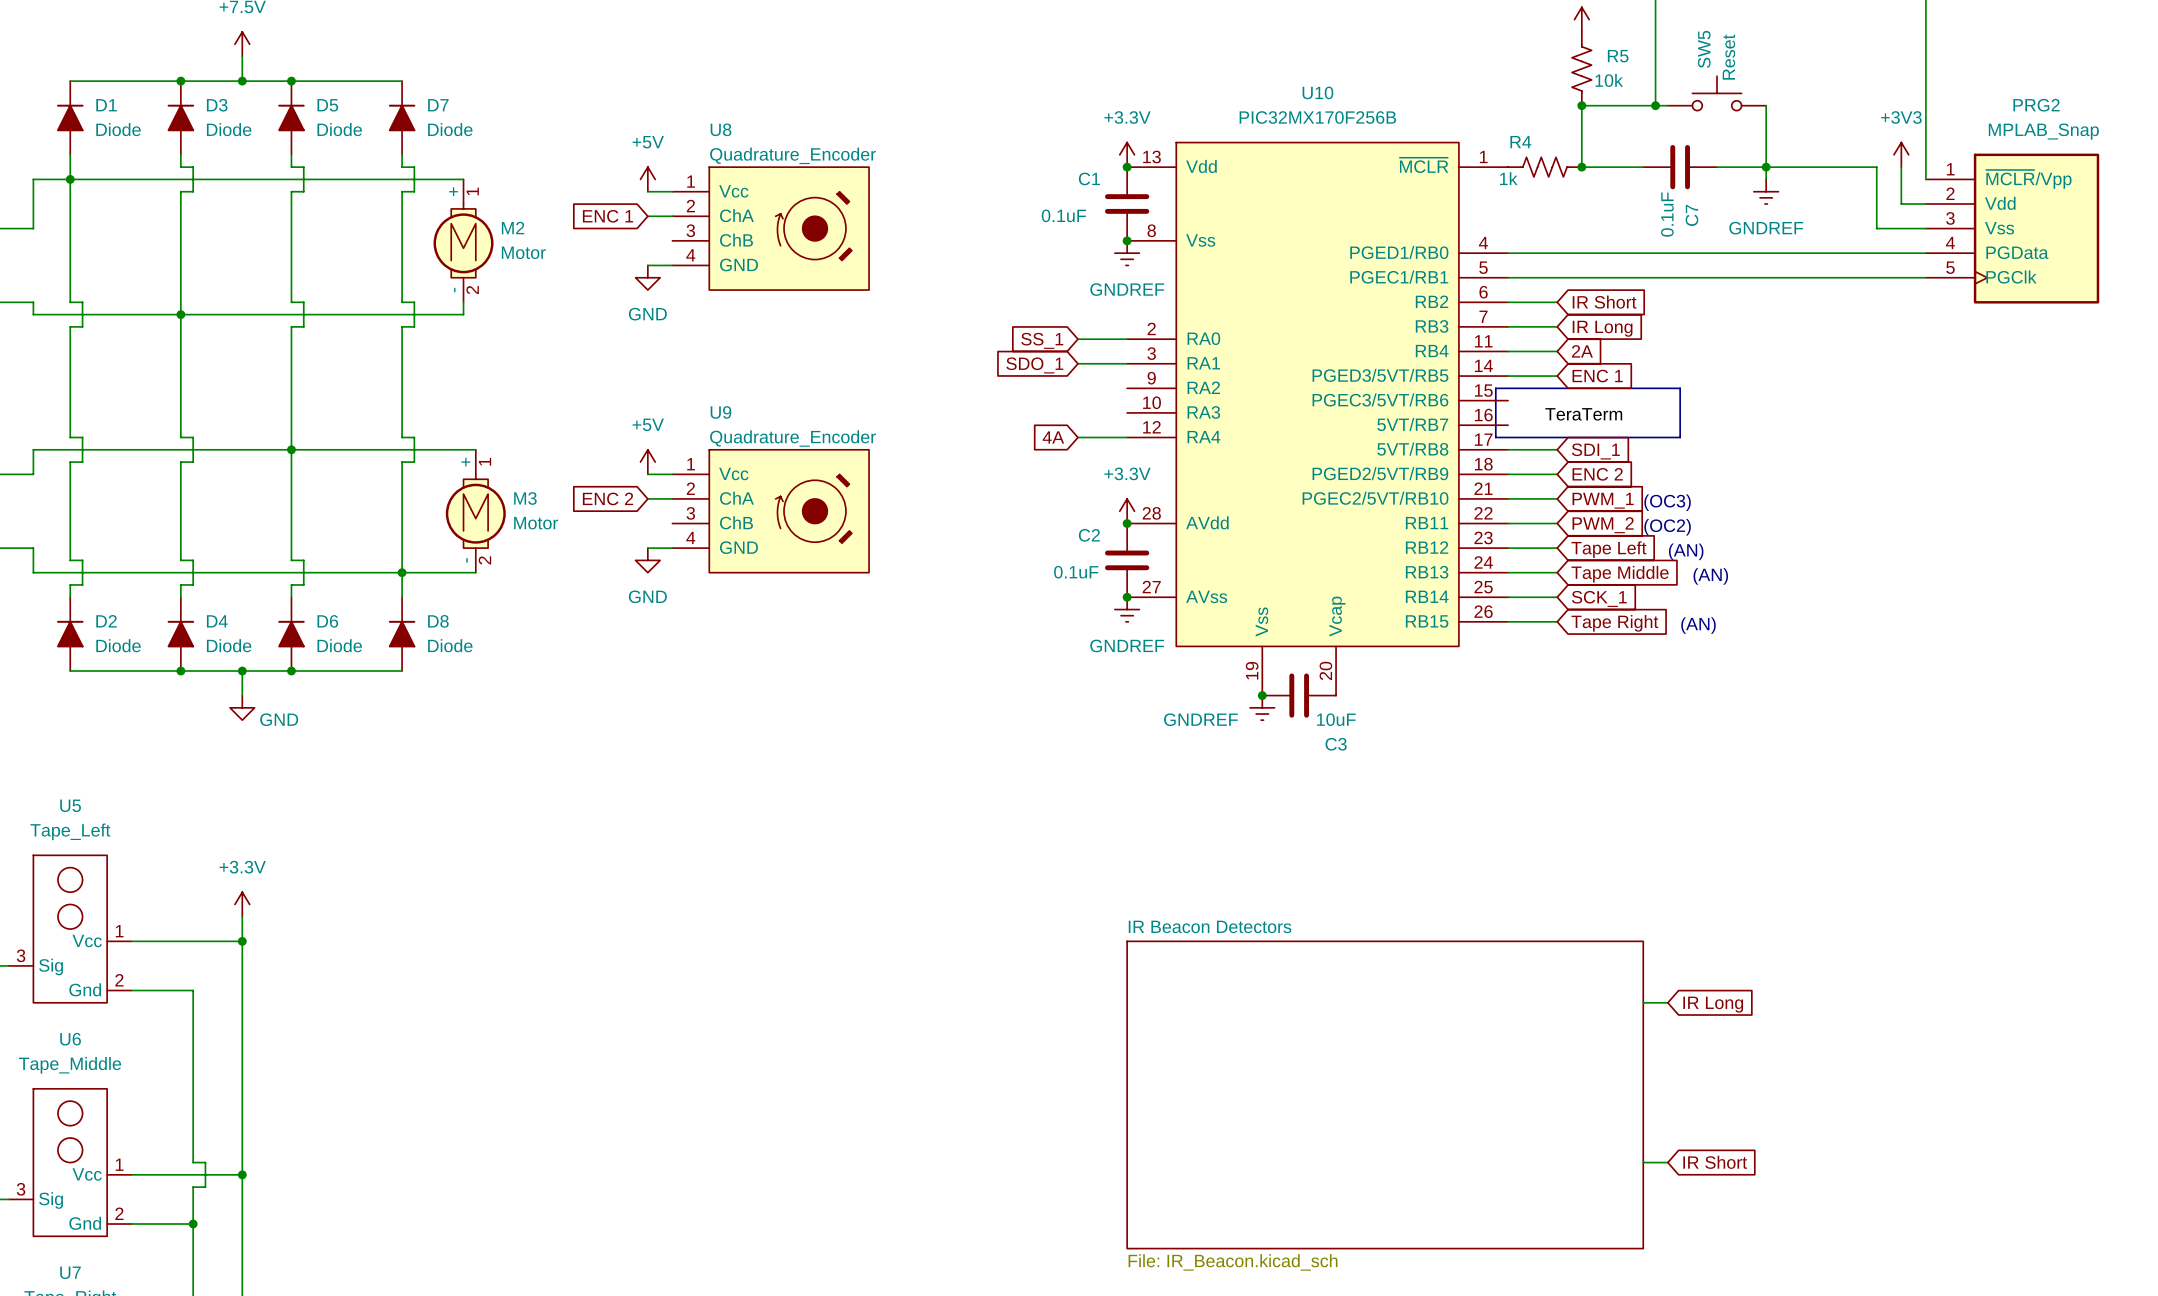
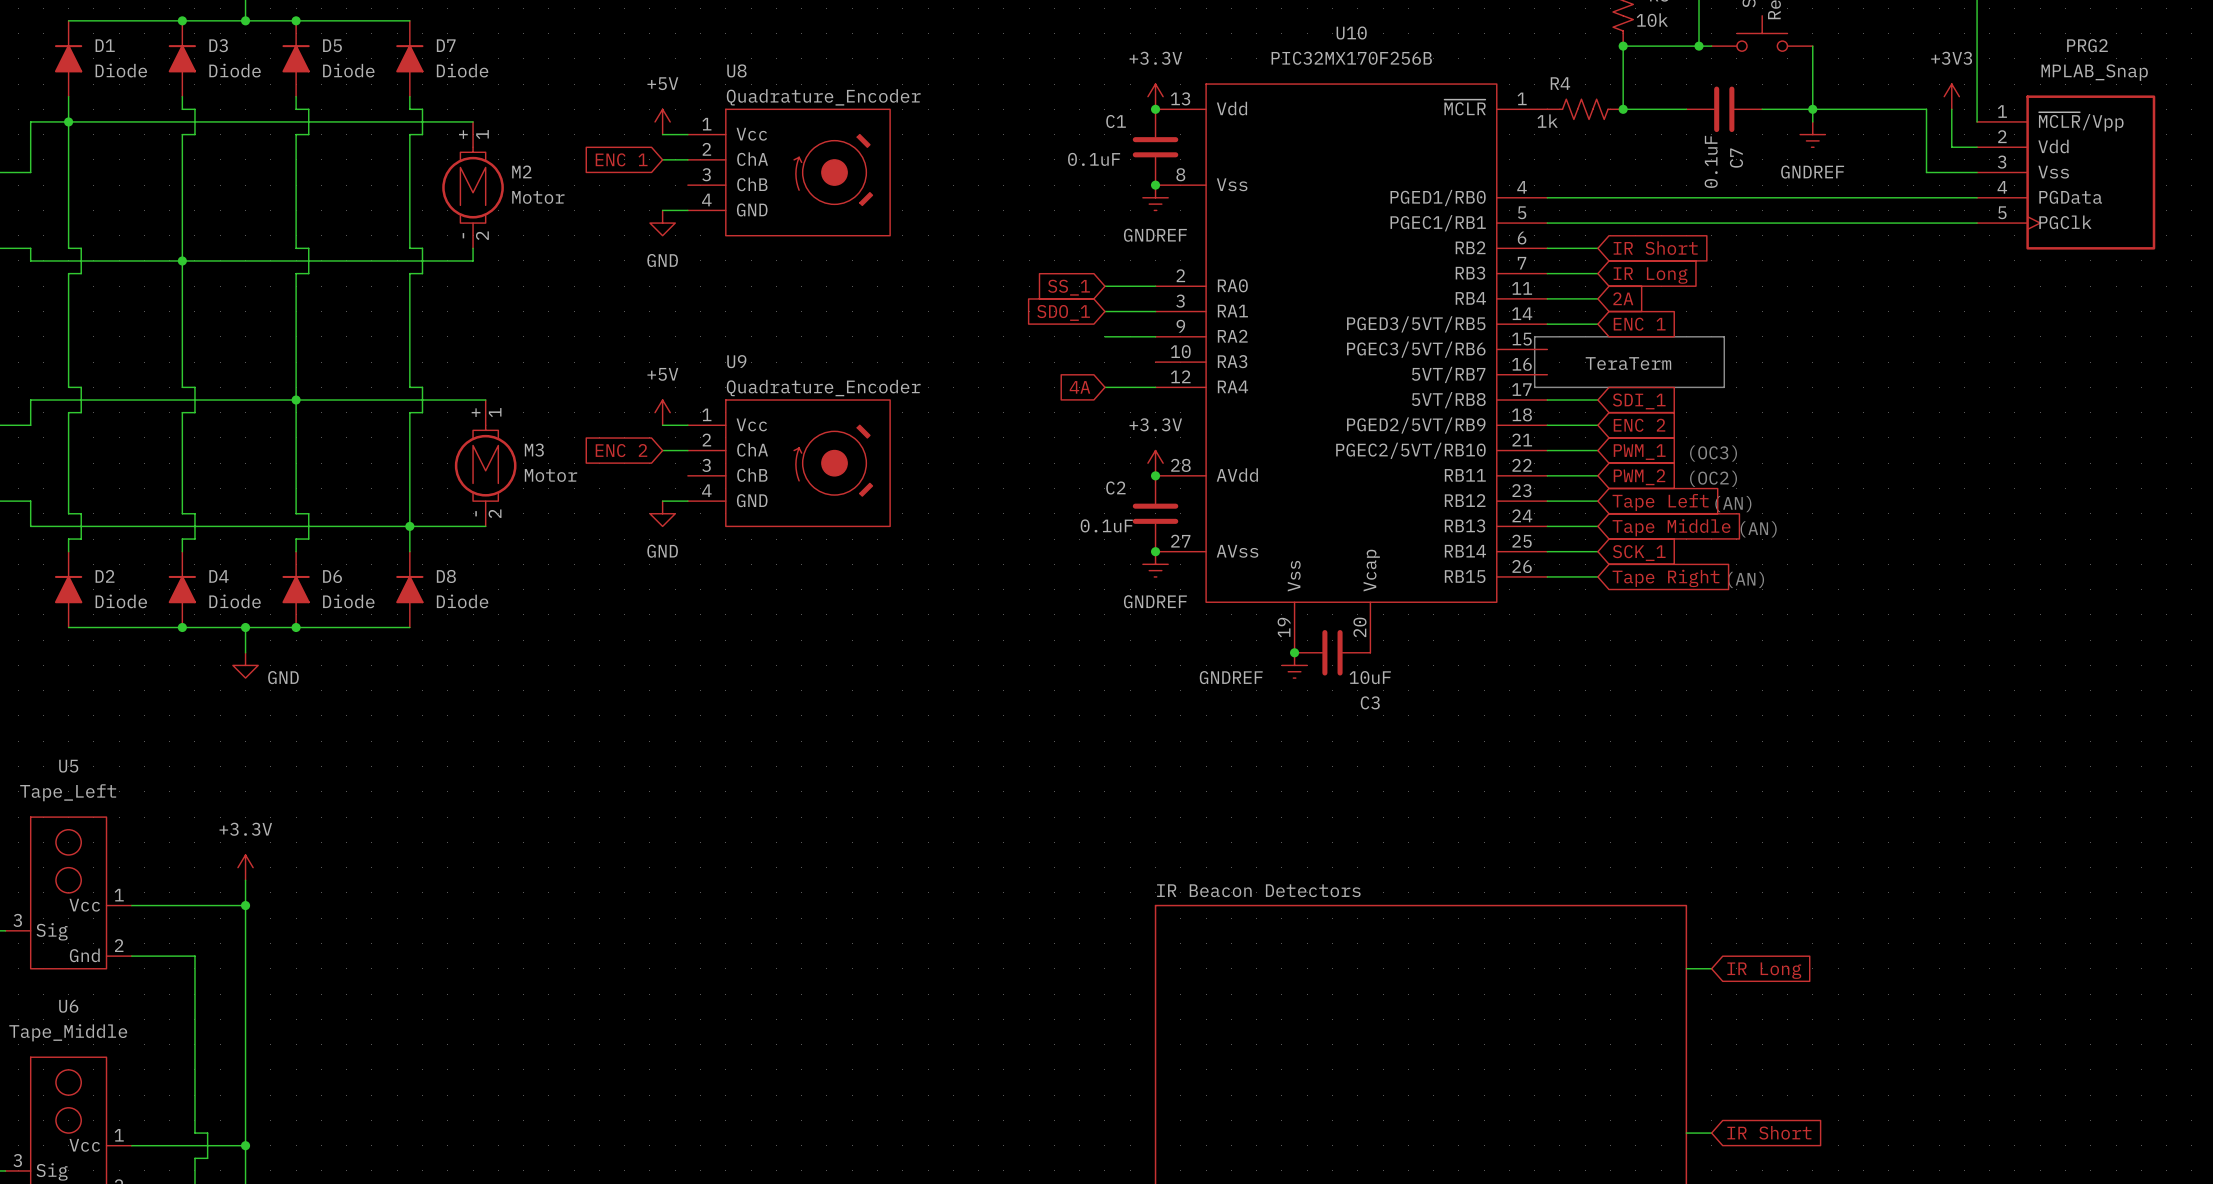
wire: none -> (1104, 336) (1155, 336)

